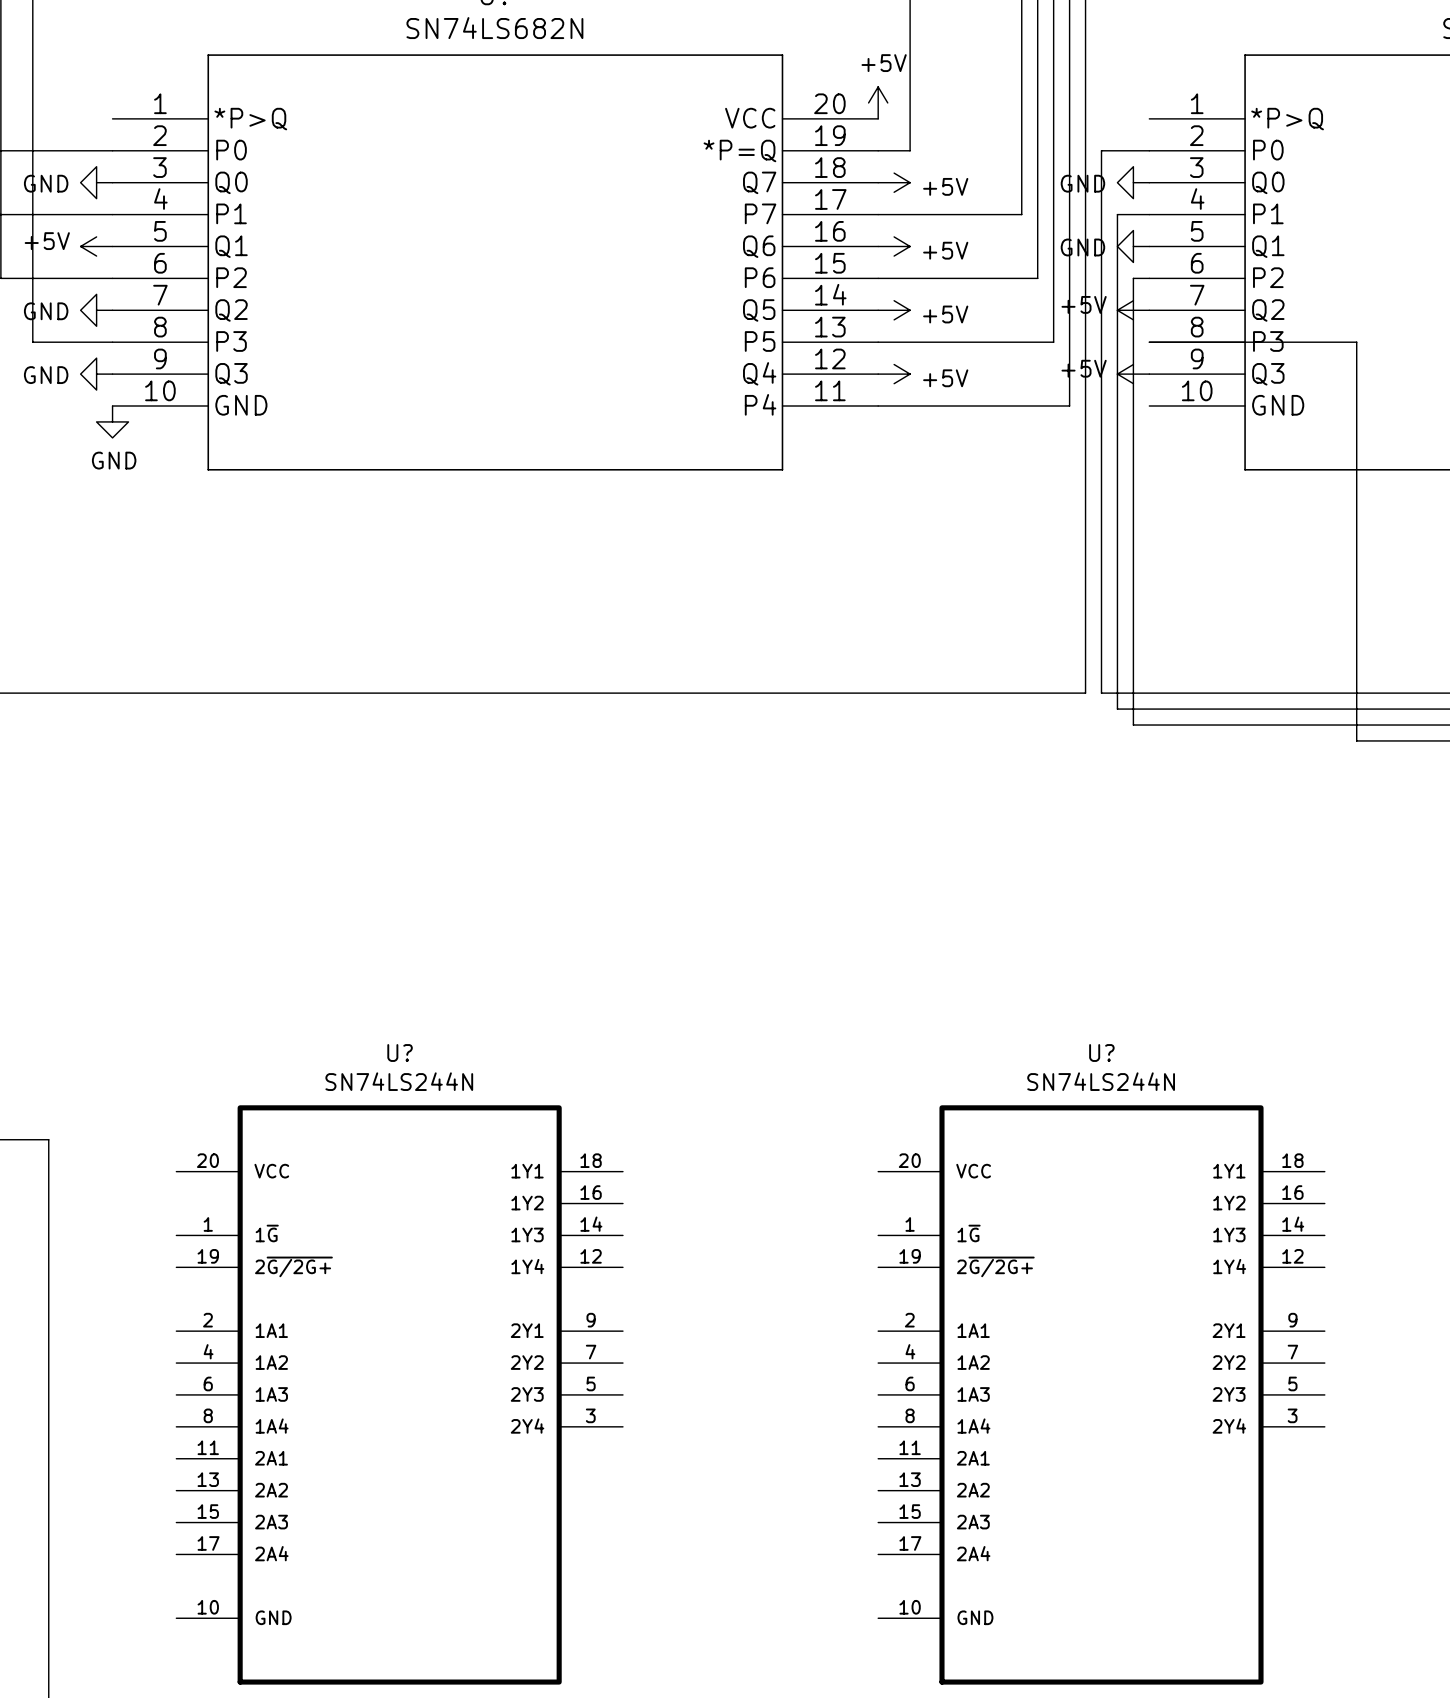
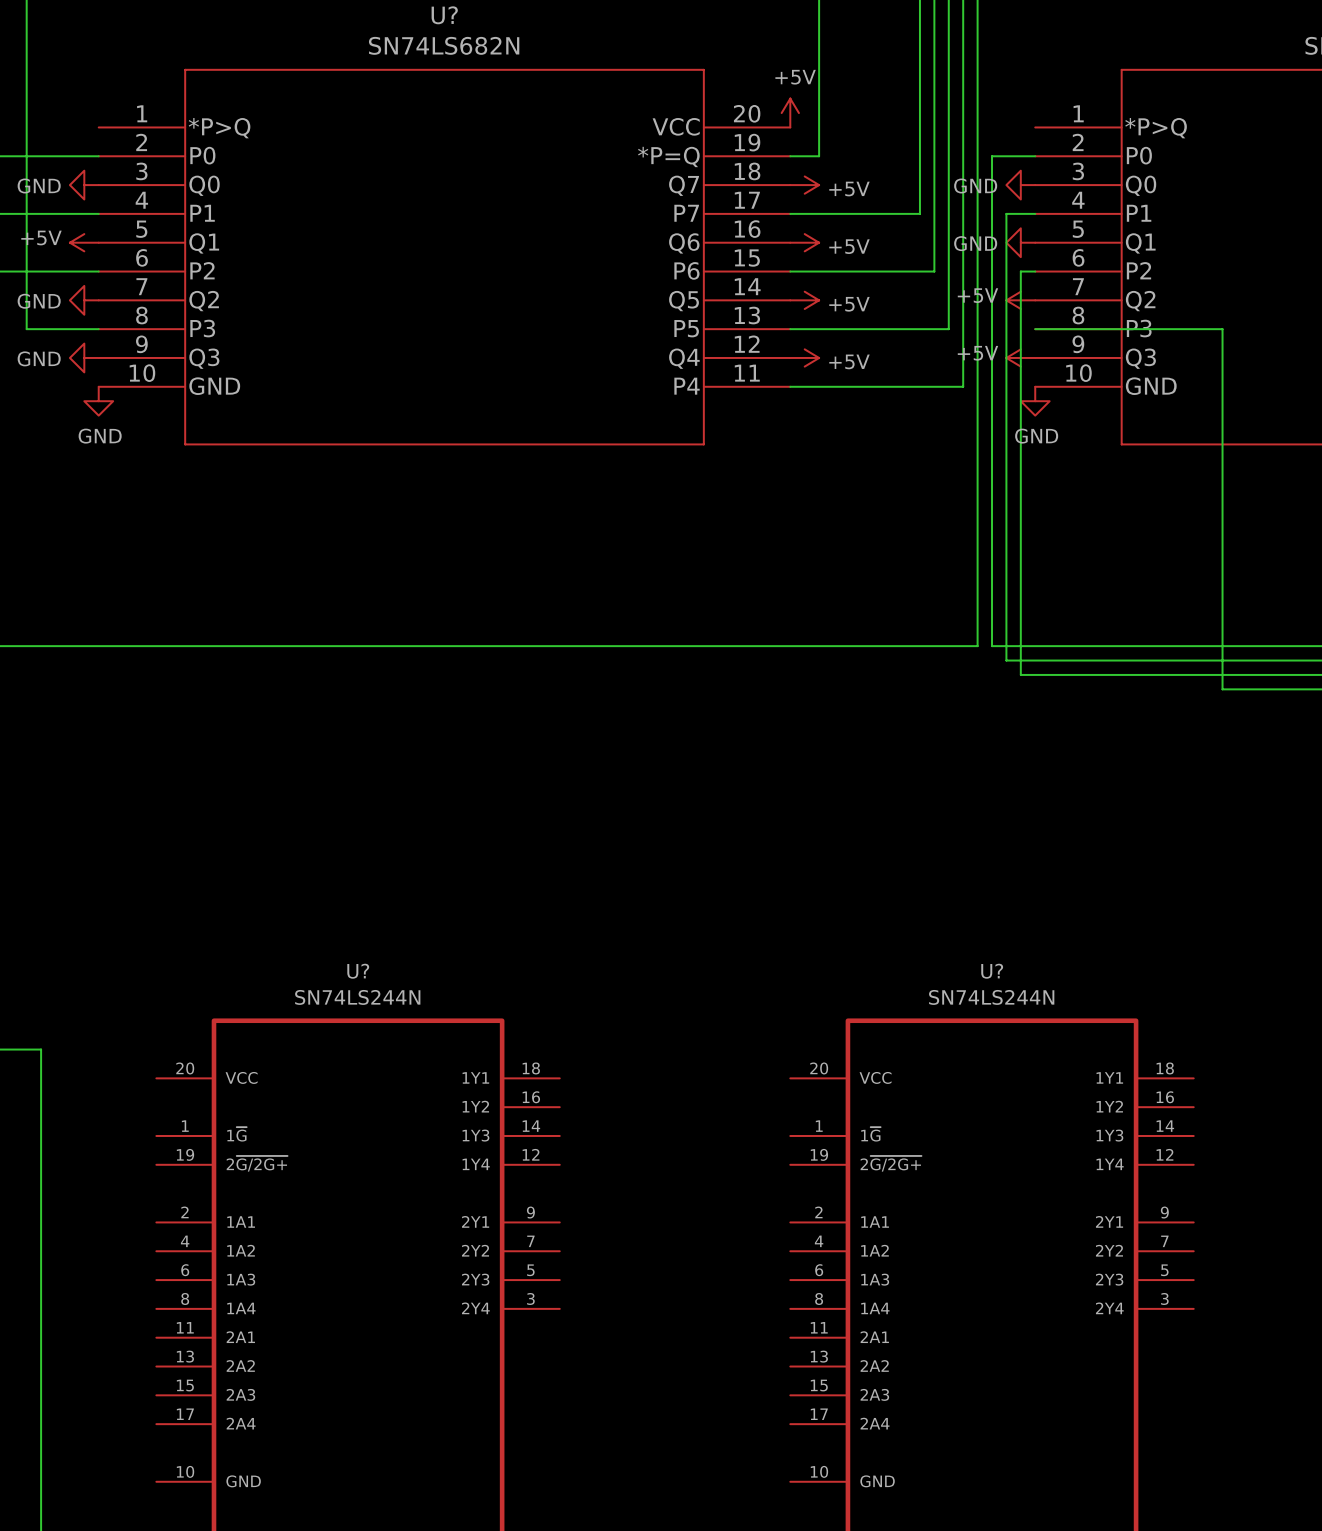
power symbol: none -> GND (1035, 401)

